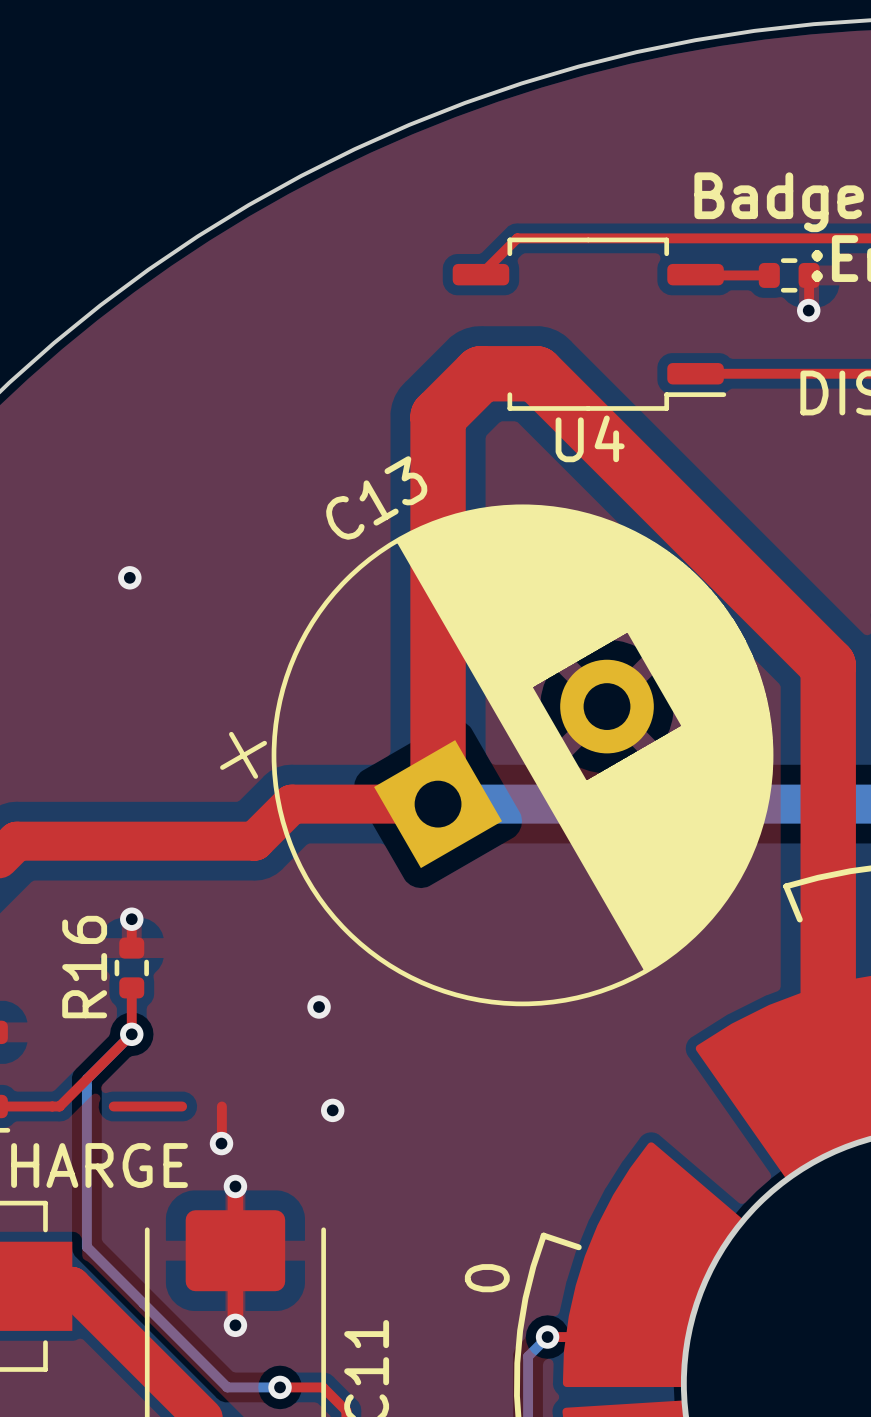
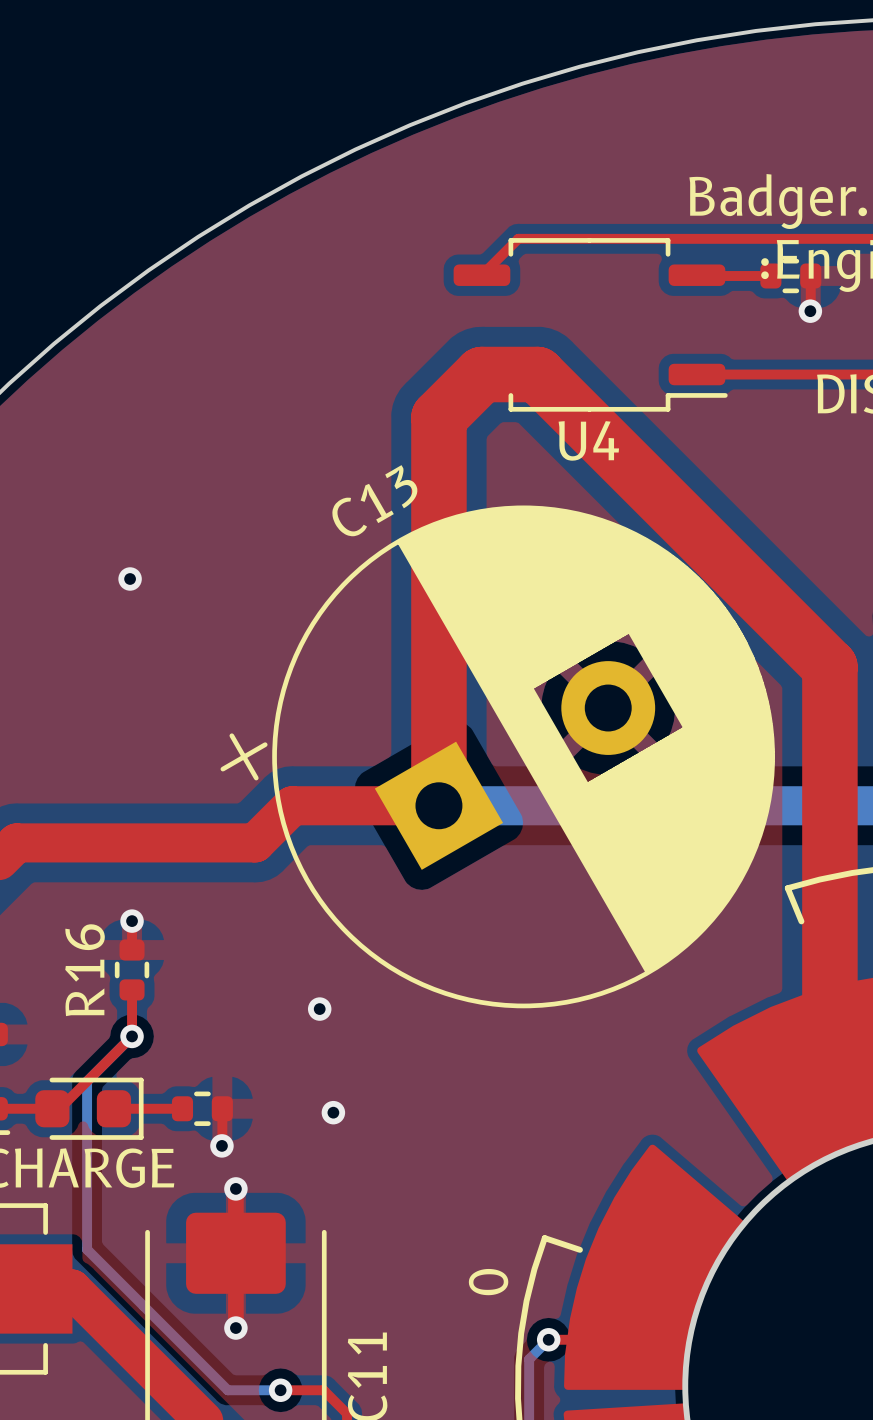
part: none -> (89, 1108)
part: none -> (202, 1108)

